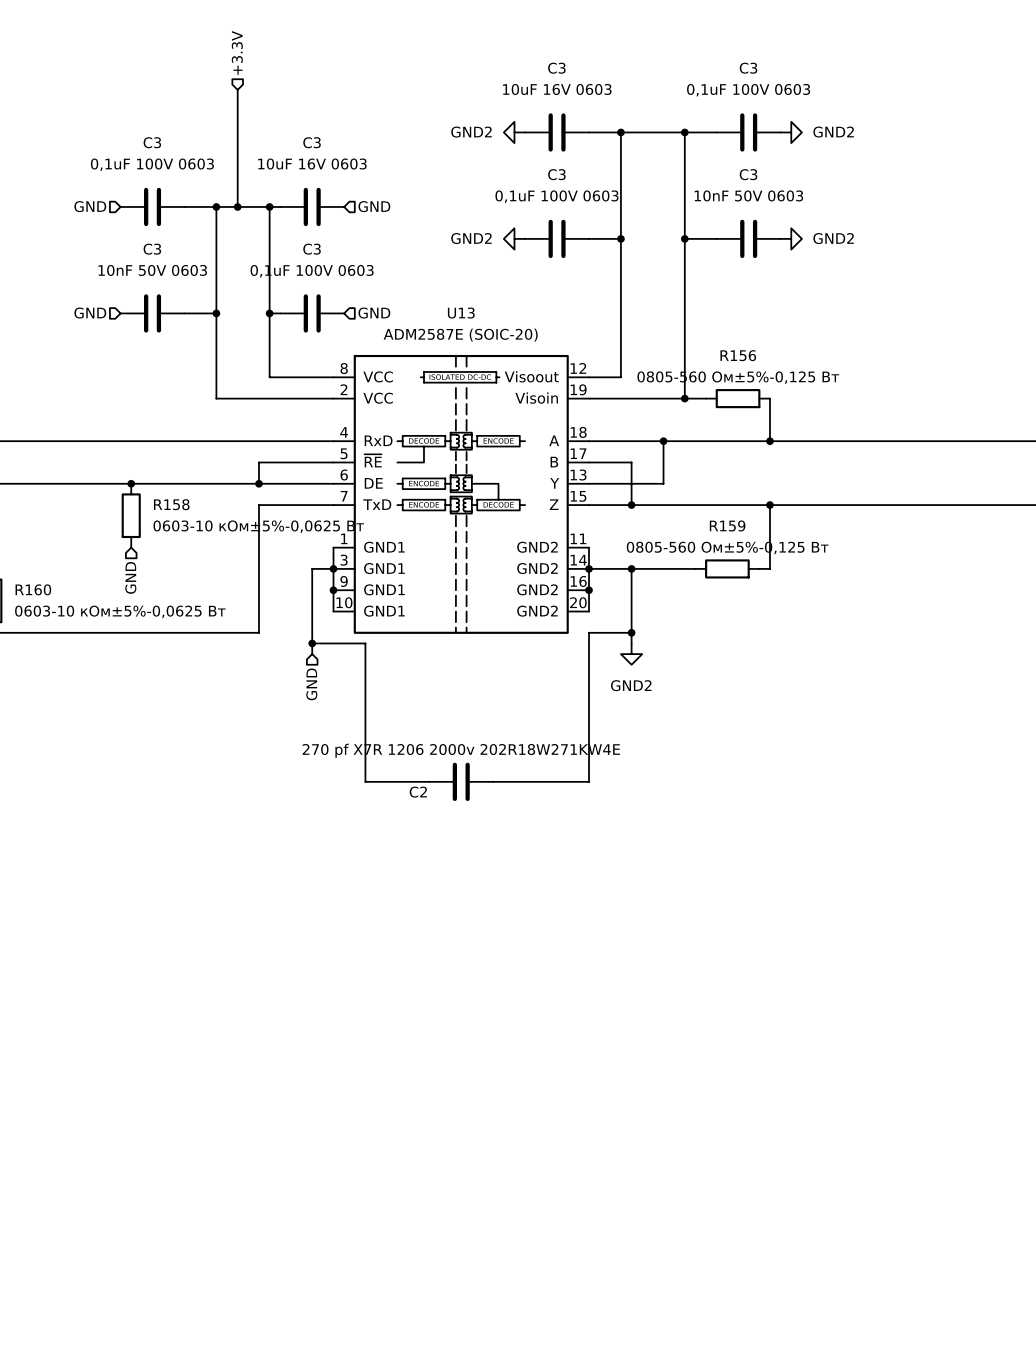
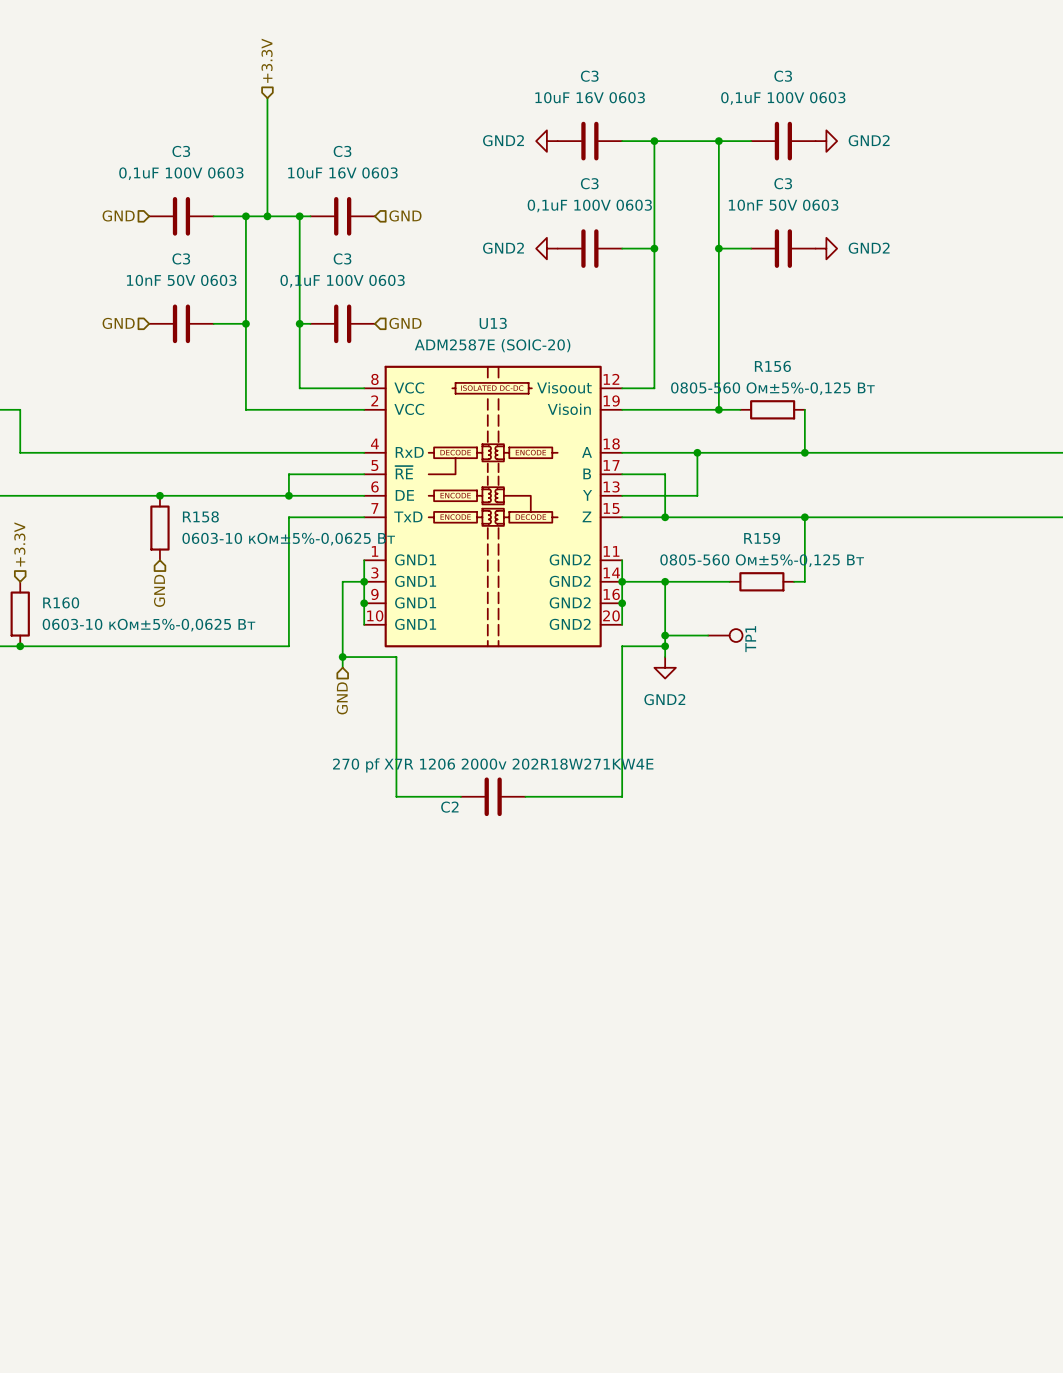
wire: none -> (665, 635) (708, 635)
junction: none -> (665, 635)
TP1: none -> (725, 635)

